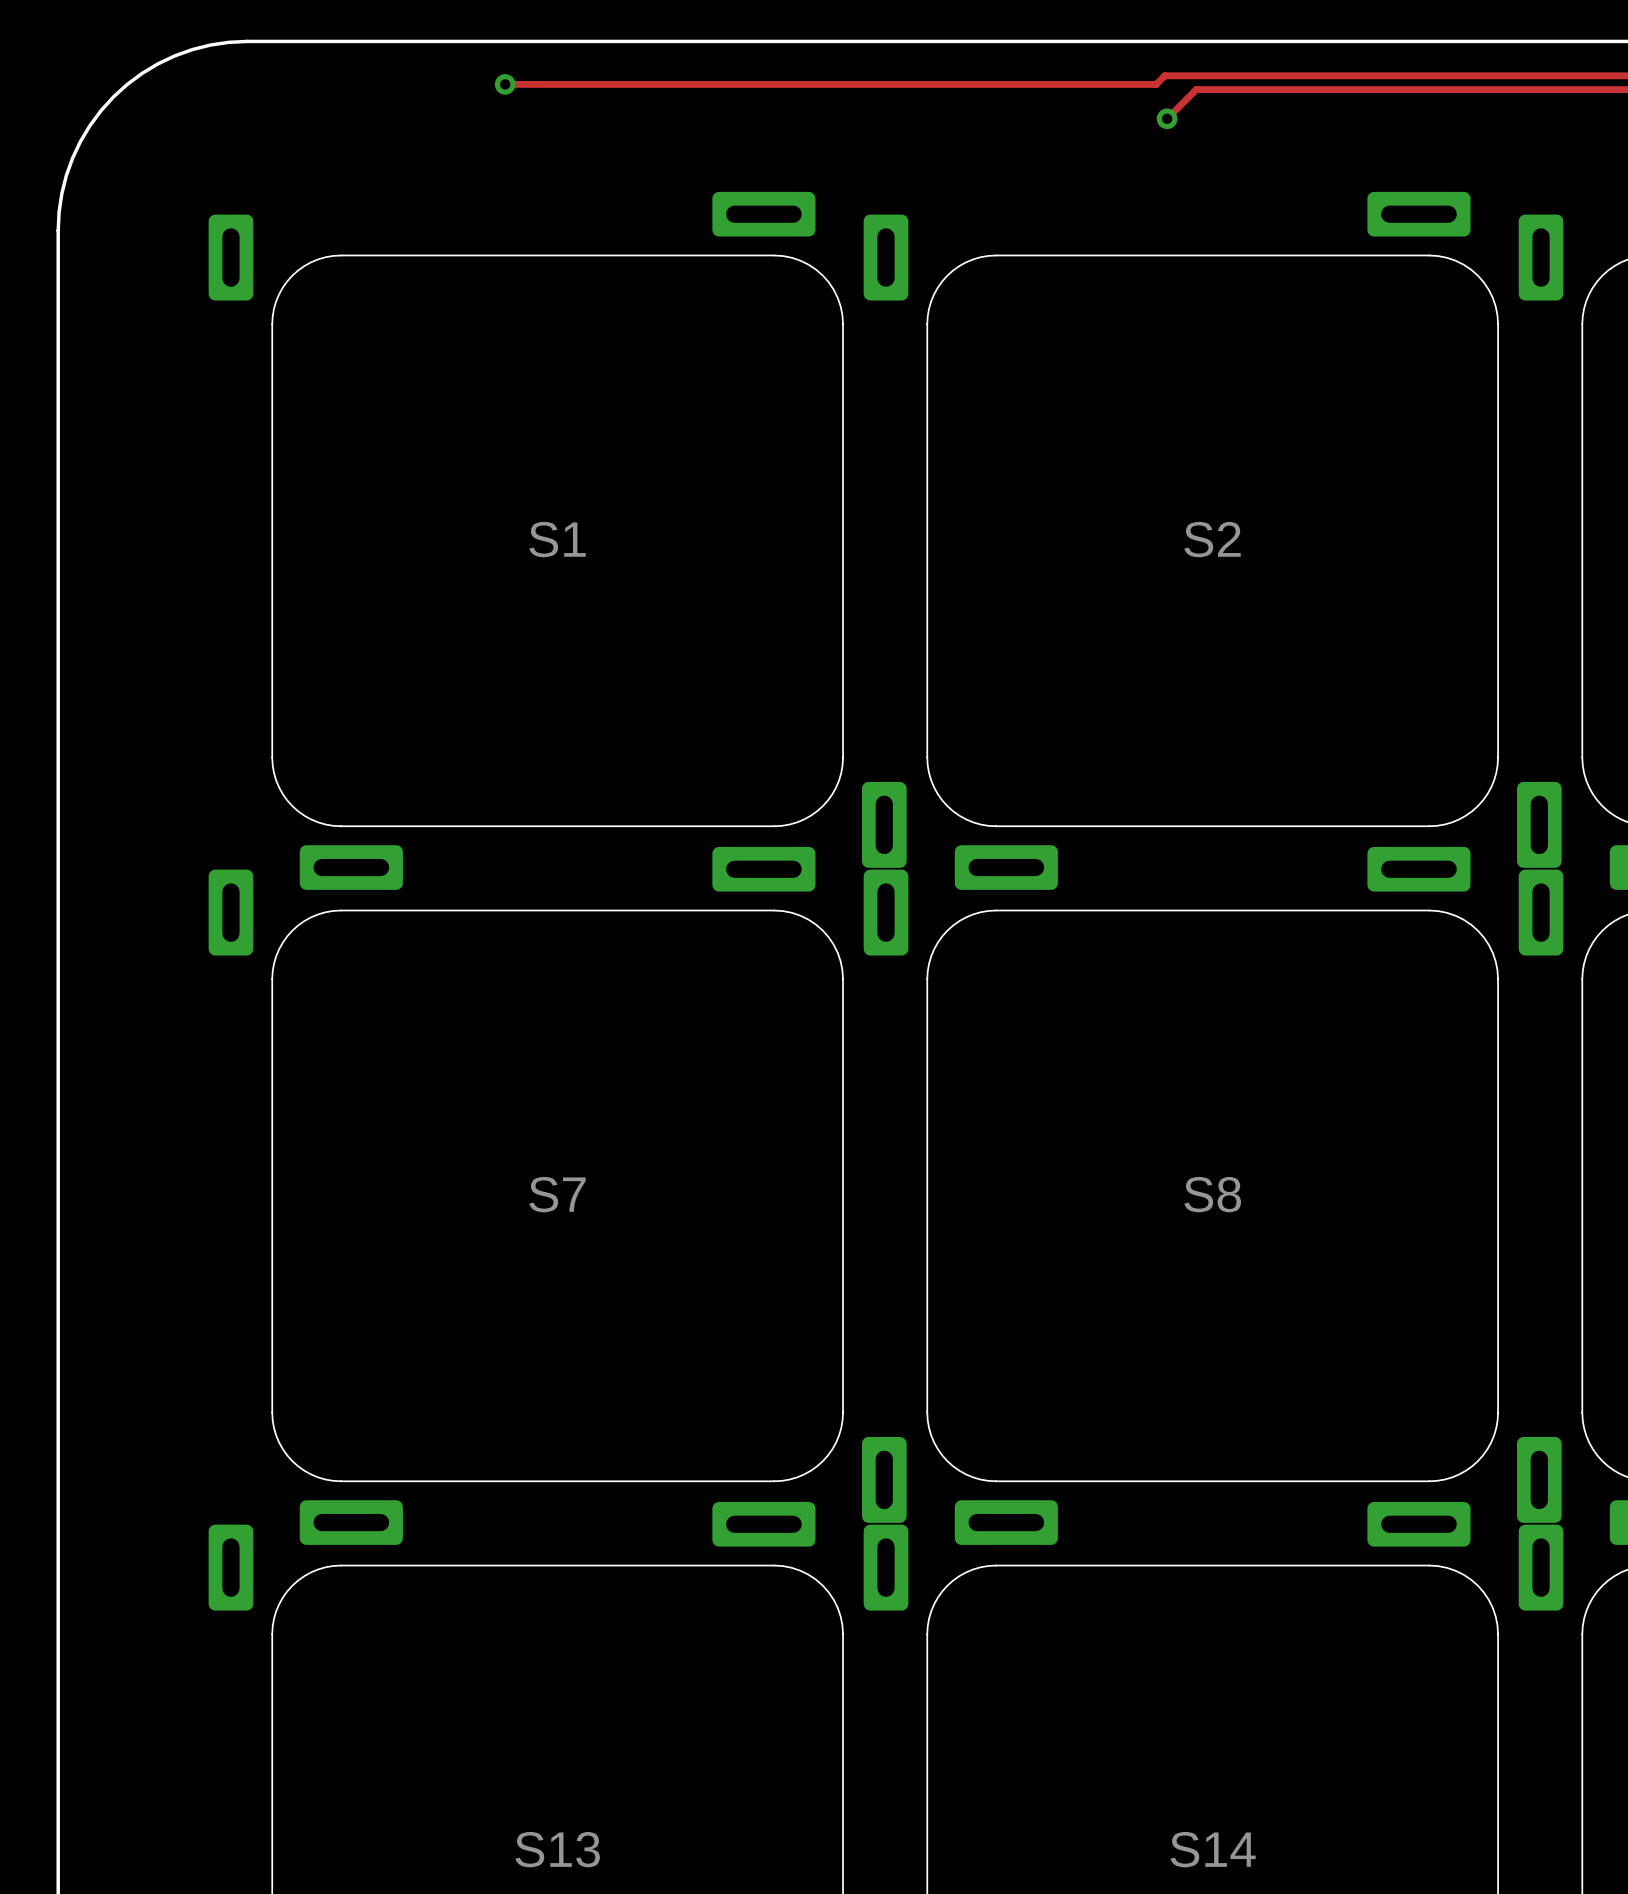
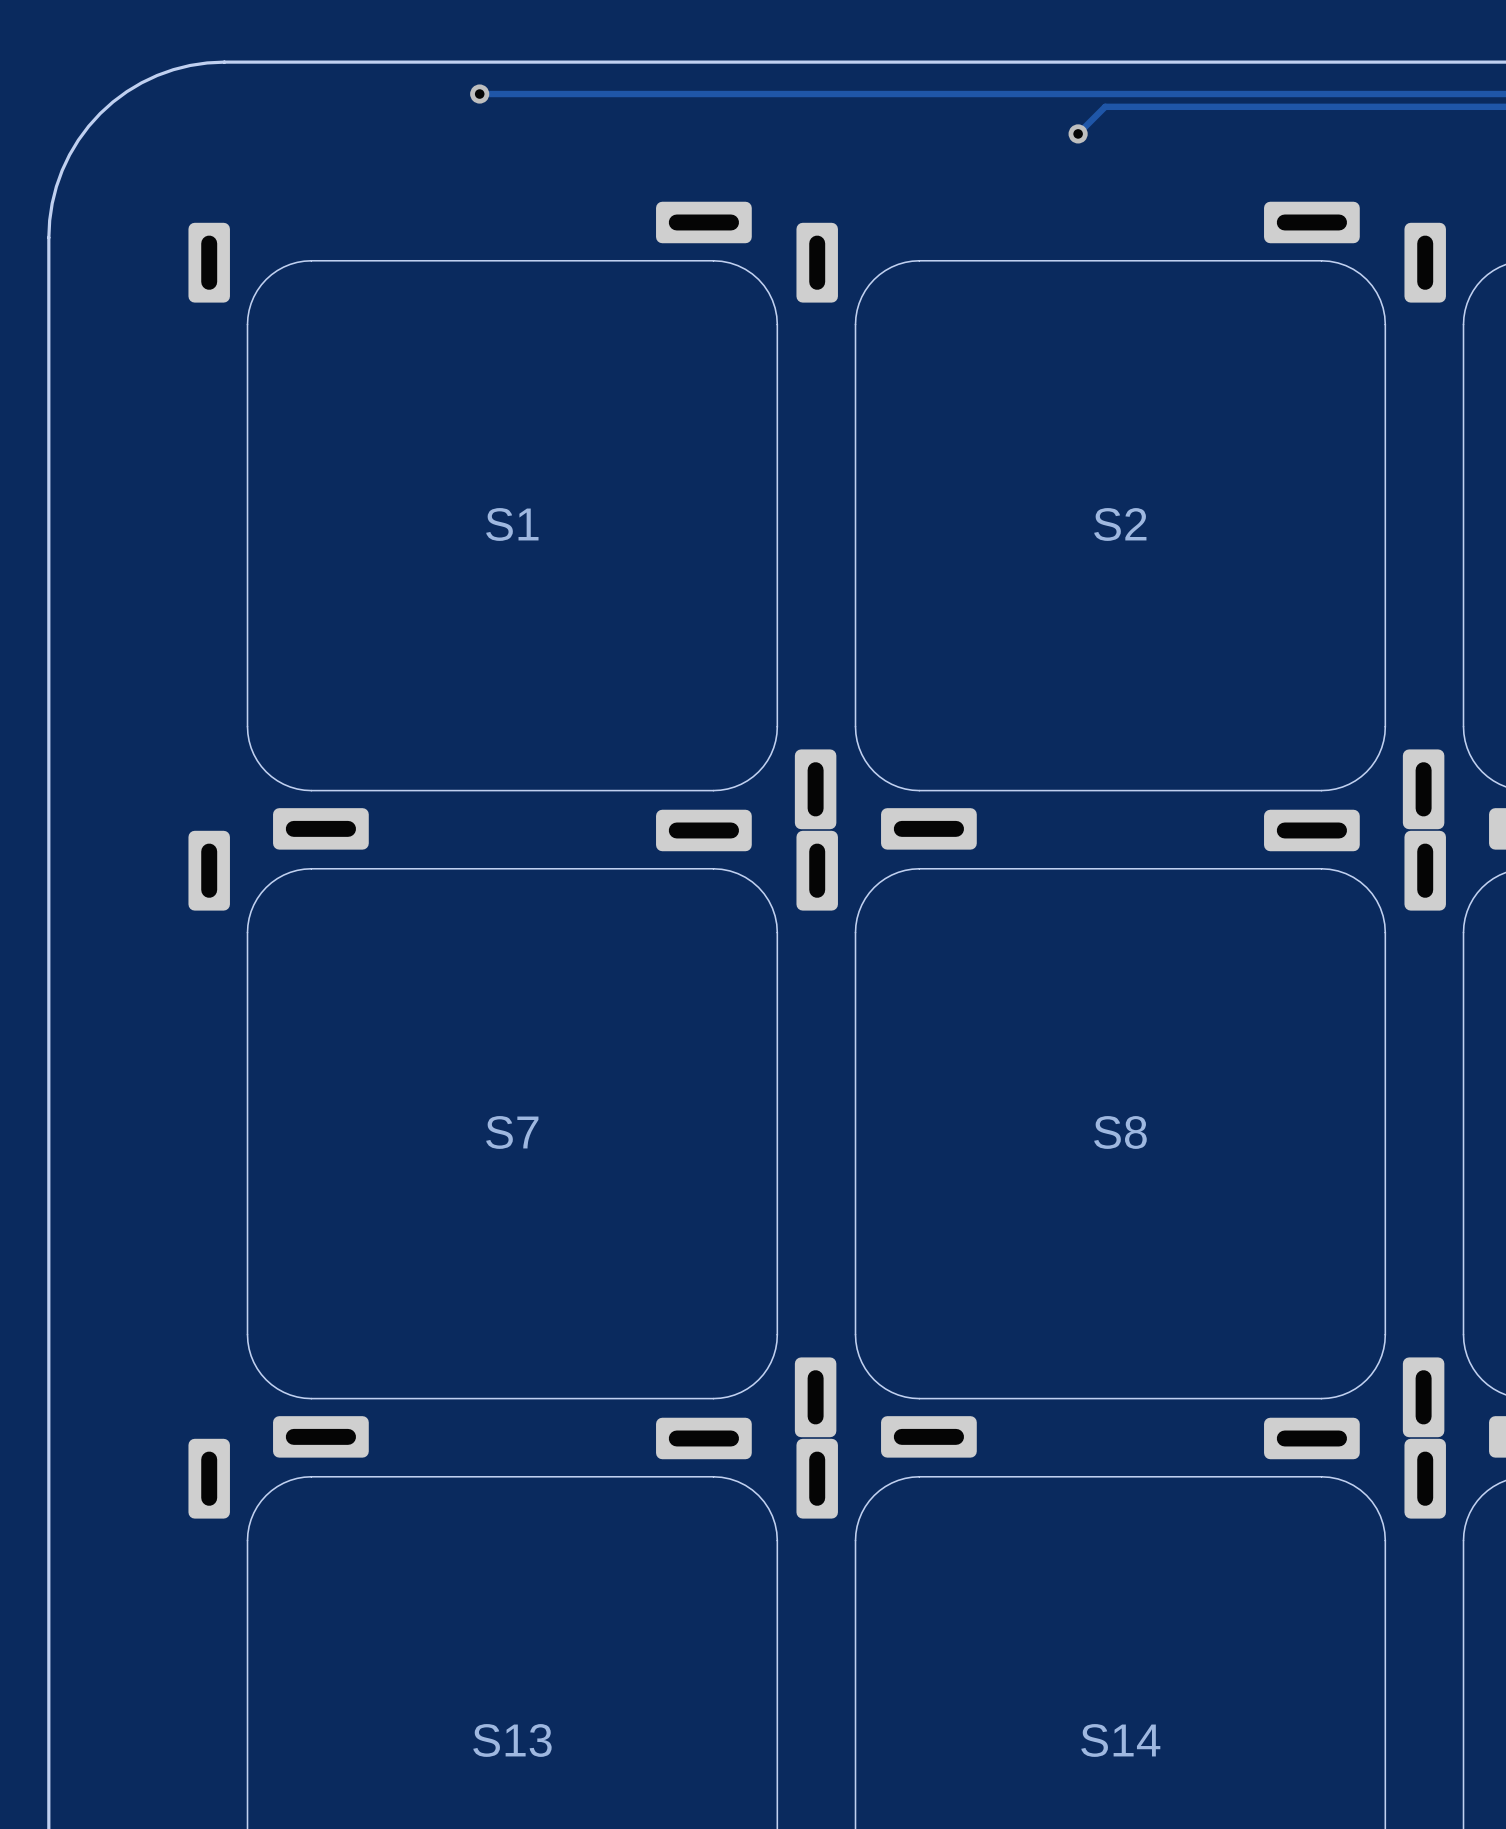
track: (1164, 75) (1156, 84) (505, 84) -> (1075, 94) (479, 94)
via position: (505, 84) -> (479, 94)

